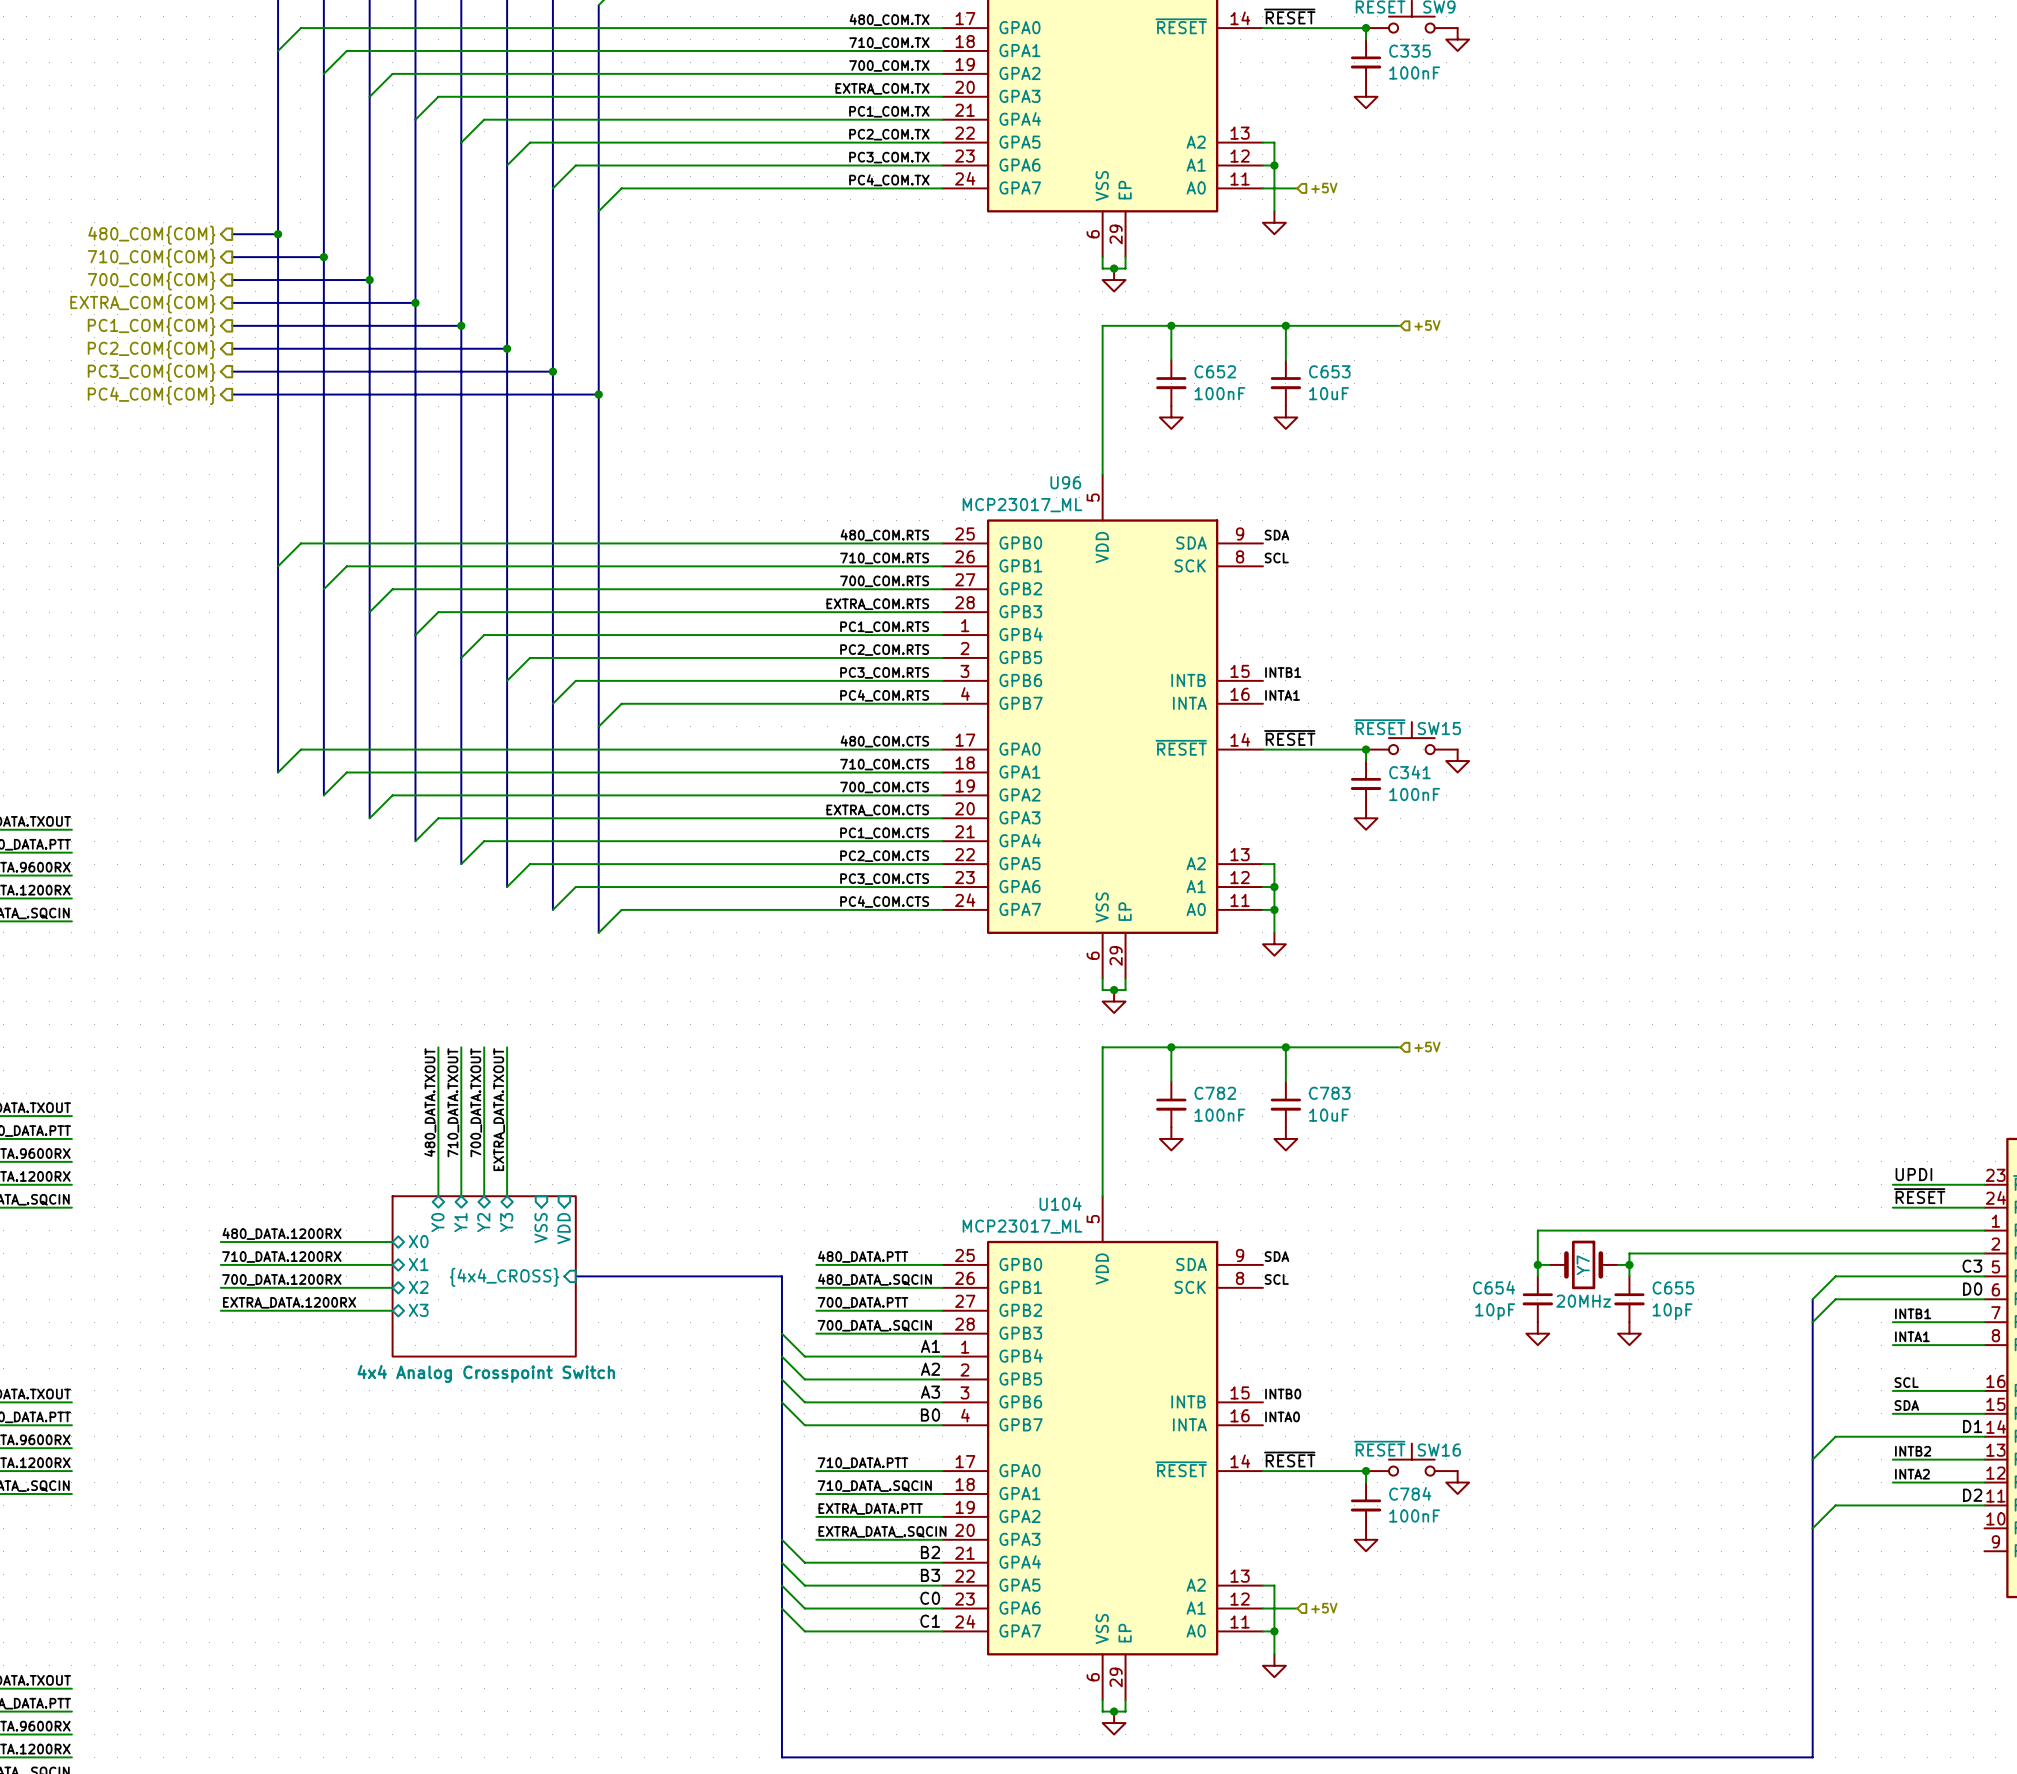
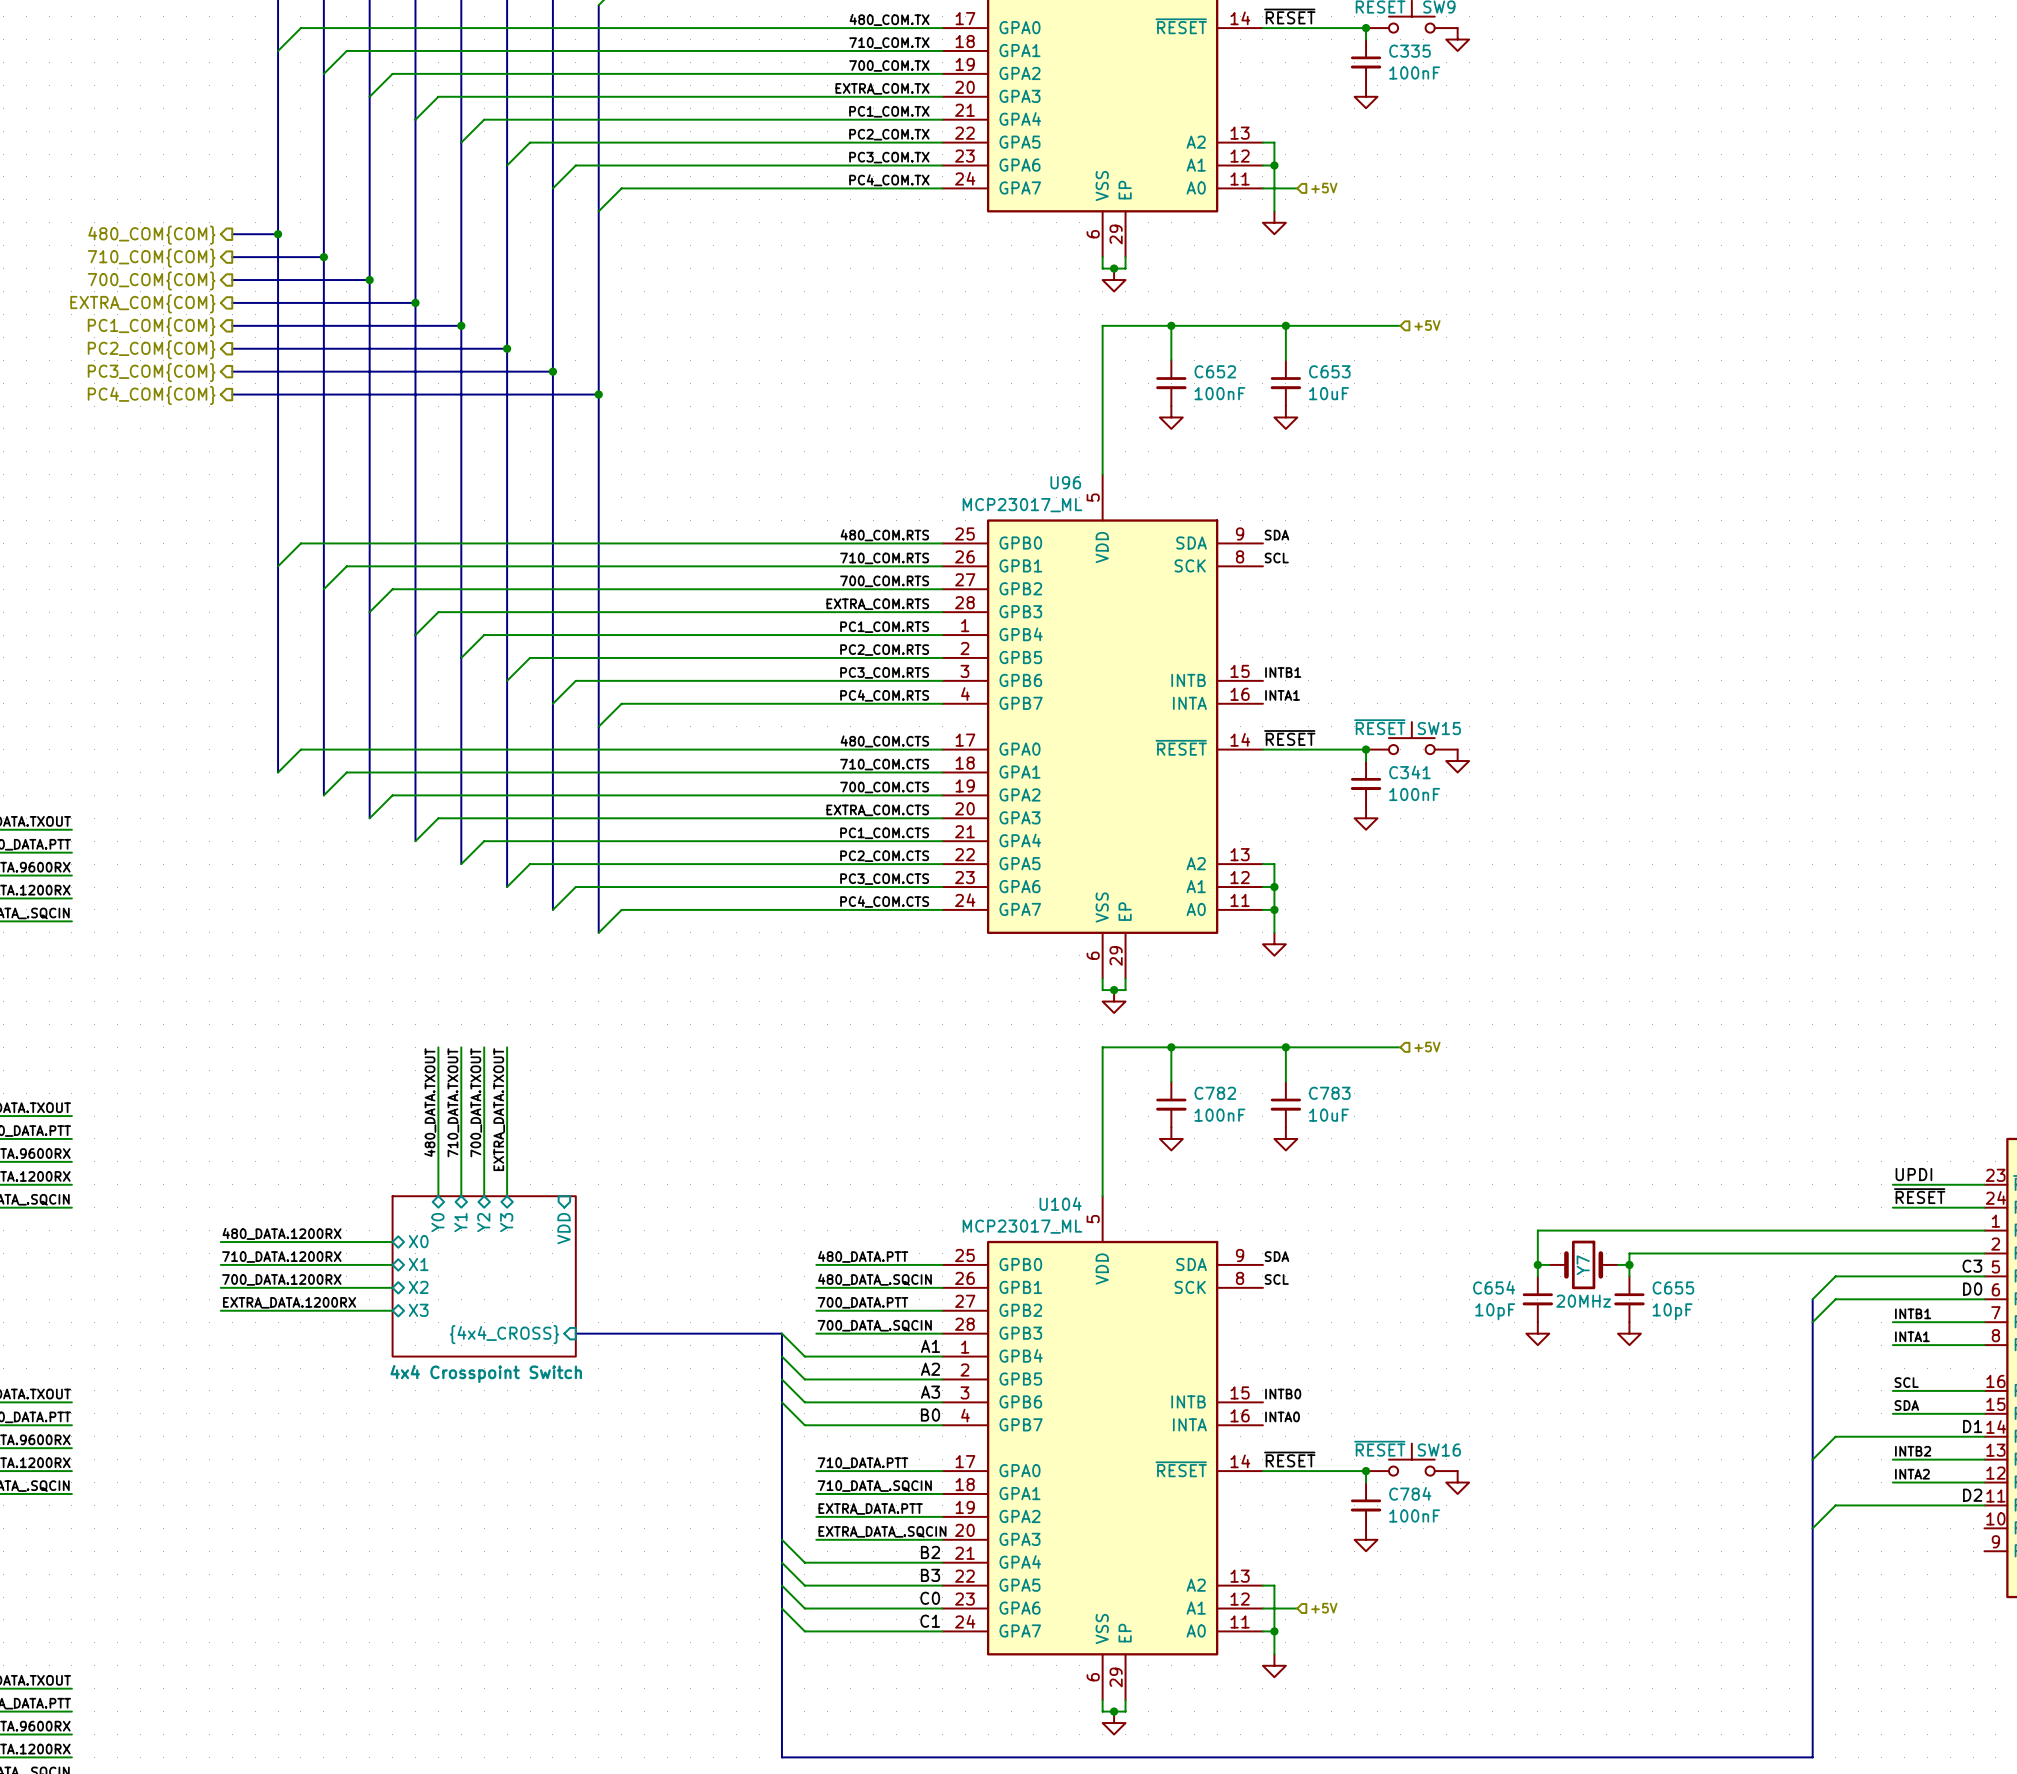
sheet pin: VSS (541, 1228) -> none
bus: (575, 1276) (781, 1276) (781, 1333) -> (575, 1333) (781, 1333)
sheet pin position: {4x4_CROSS} (504, 1277) -> {4x4_CROSS} (504, 1334)
sheet 4x4 Analog Crosspoint Switch name: 4x4 Analog Crosspoint Switch (486, 1373) -> 4x4 Crosspoint Switch (486, 1373)

